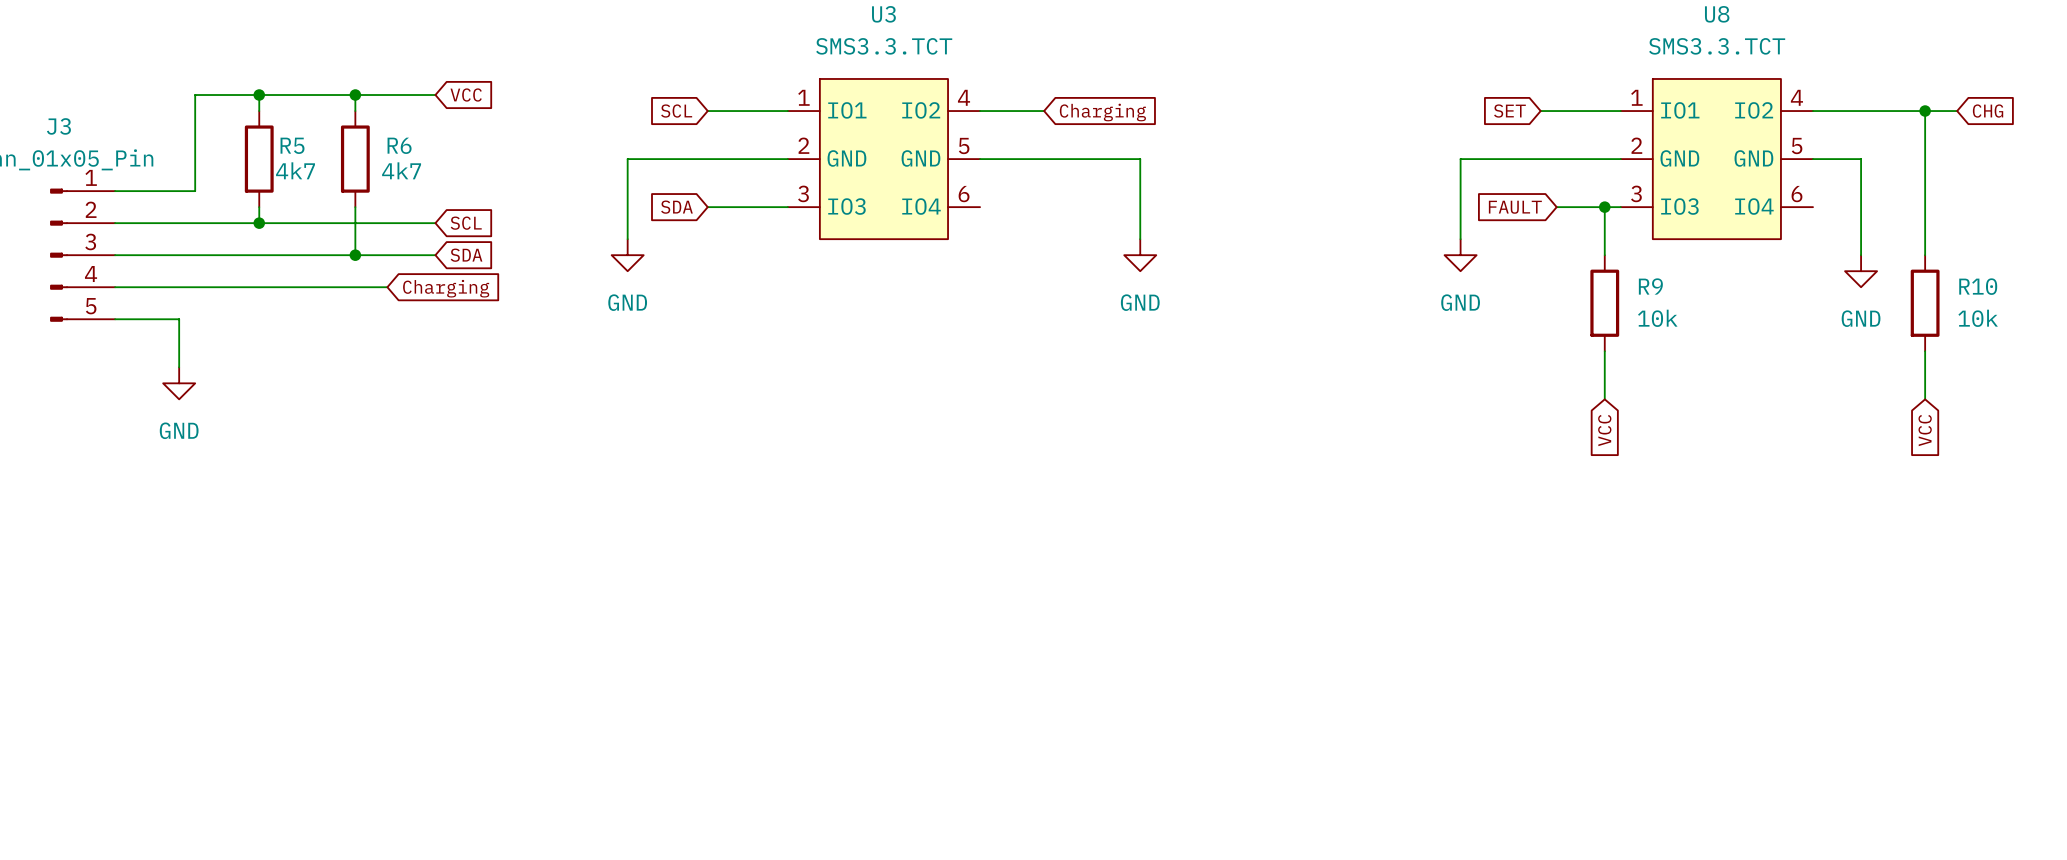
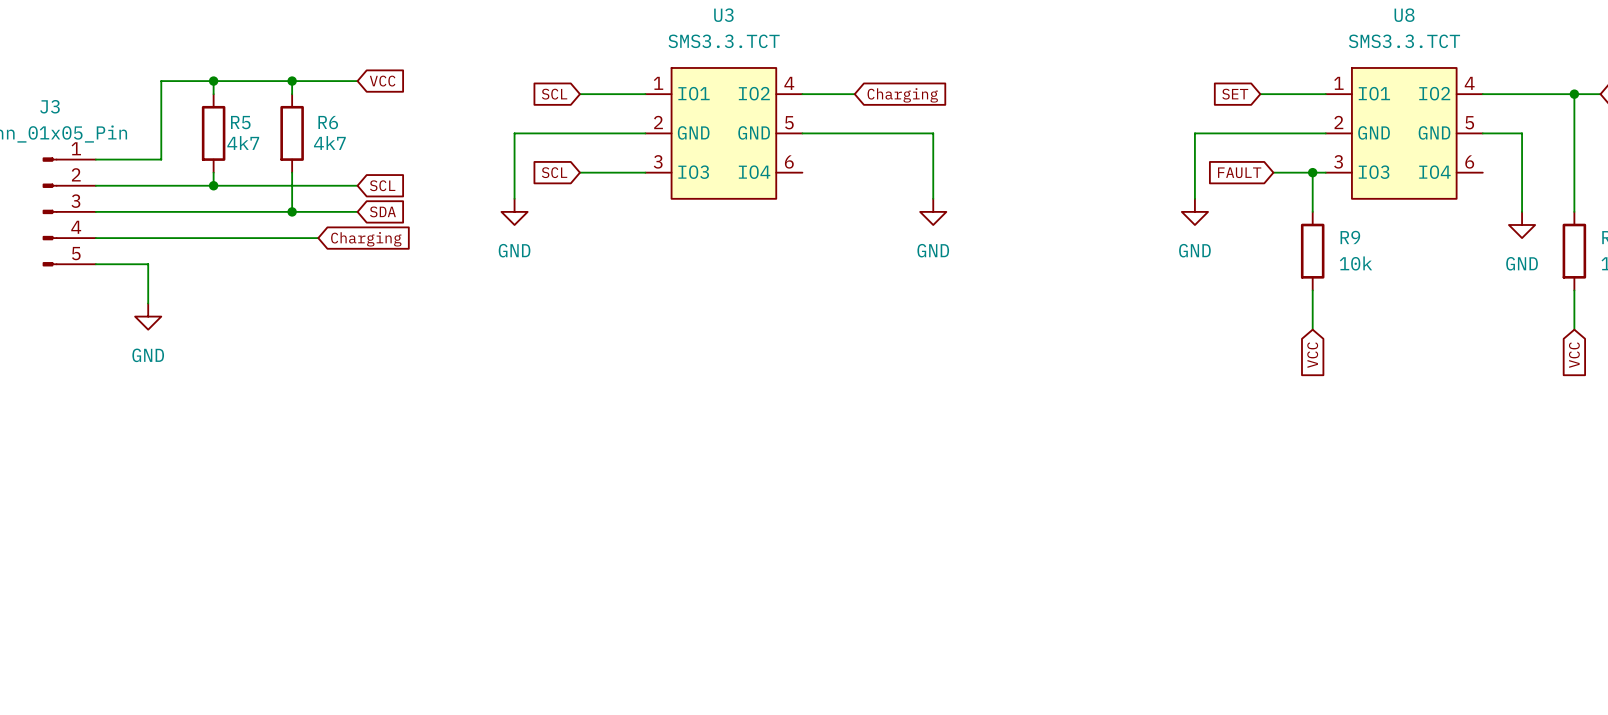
global label: SDA (676, 207) -> SCL (554, 172)

